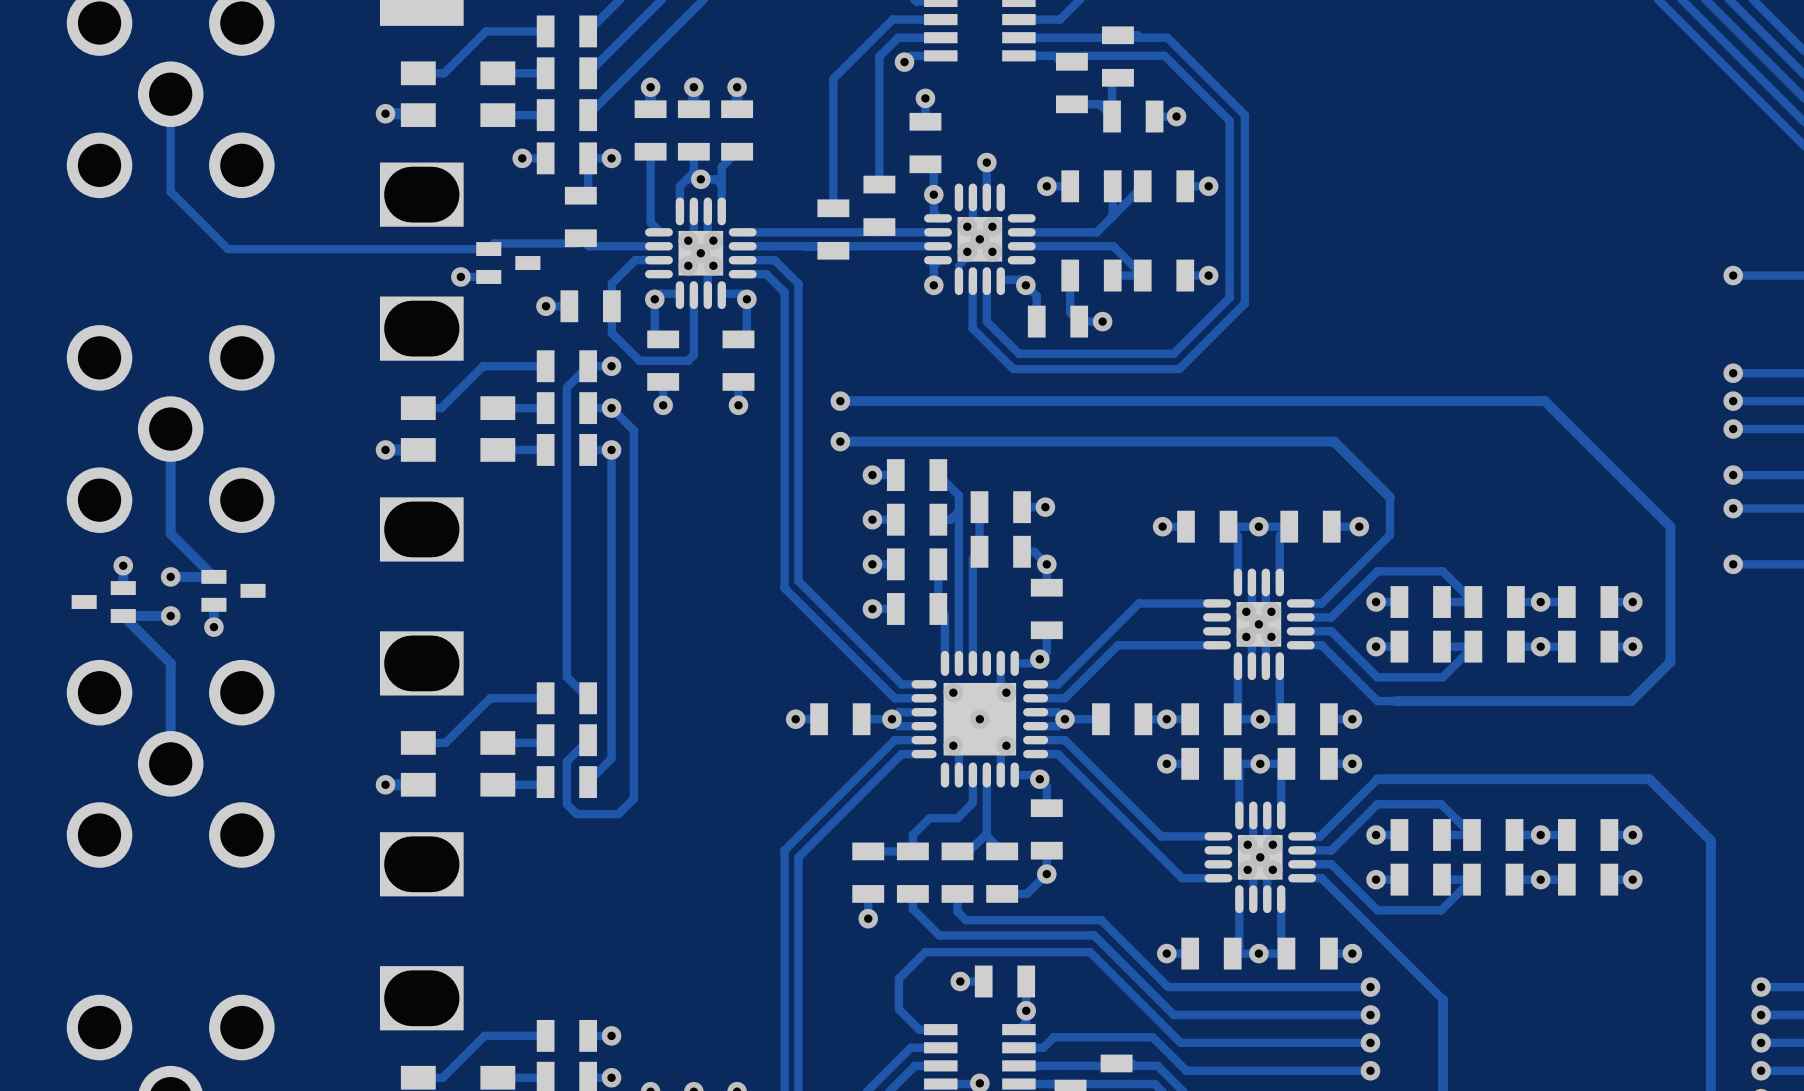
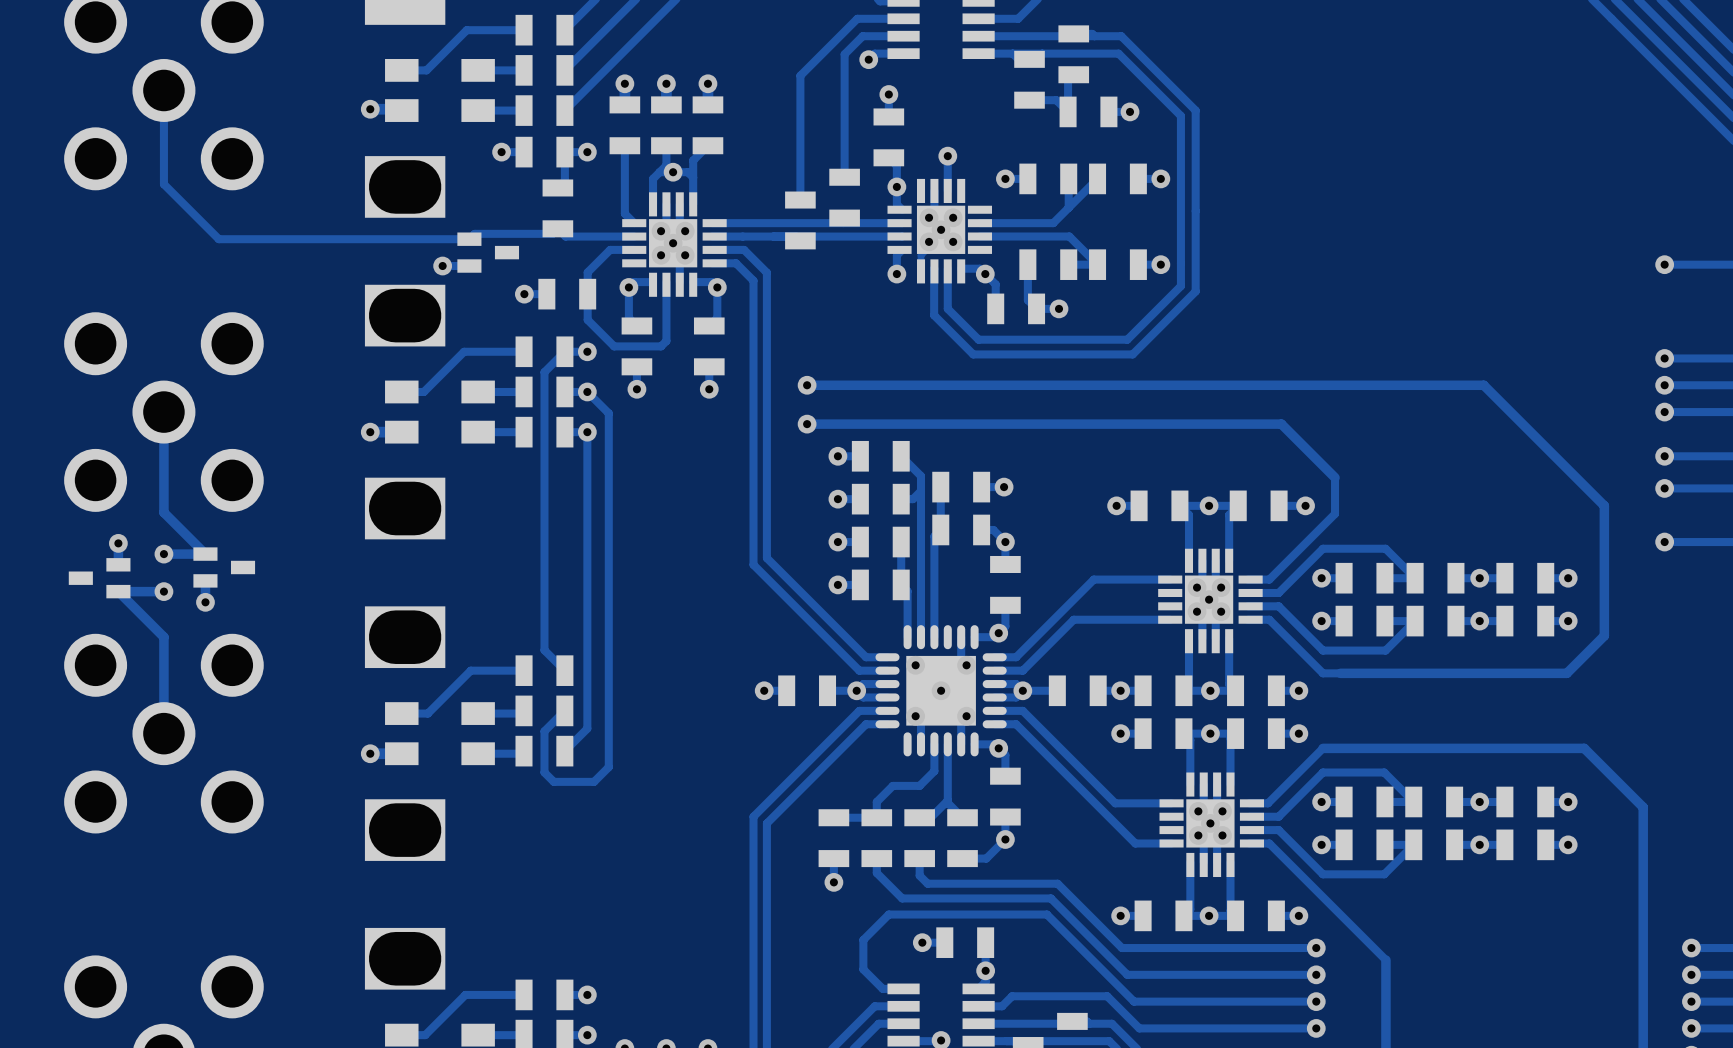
part footprint: [924, 183, 1036, 296] -> [887, 178, 993, 284]
part footprint: [645, 197, 757, 310] -> [622, 192, 727, 297]
part footprint: [1203, 568, 1315, 681] -> [1158, 548, 1263, 654]
part footprint: [1204, 801, 1317, 914] -> [1159, 772, 1265, 878]

